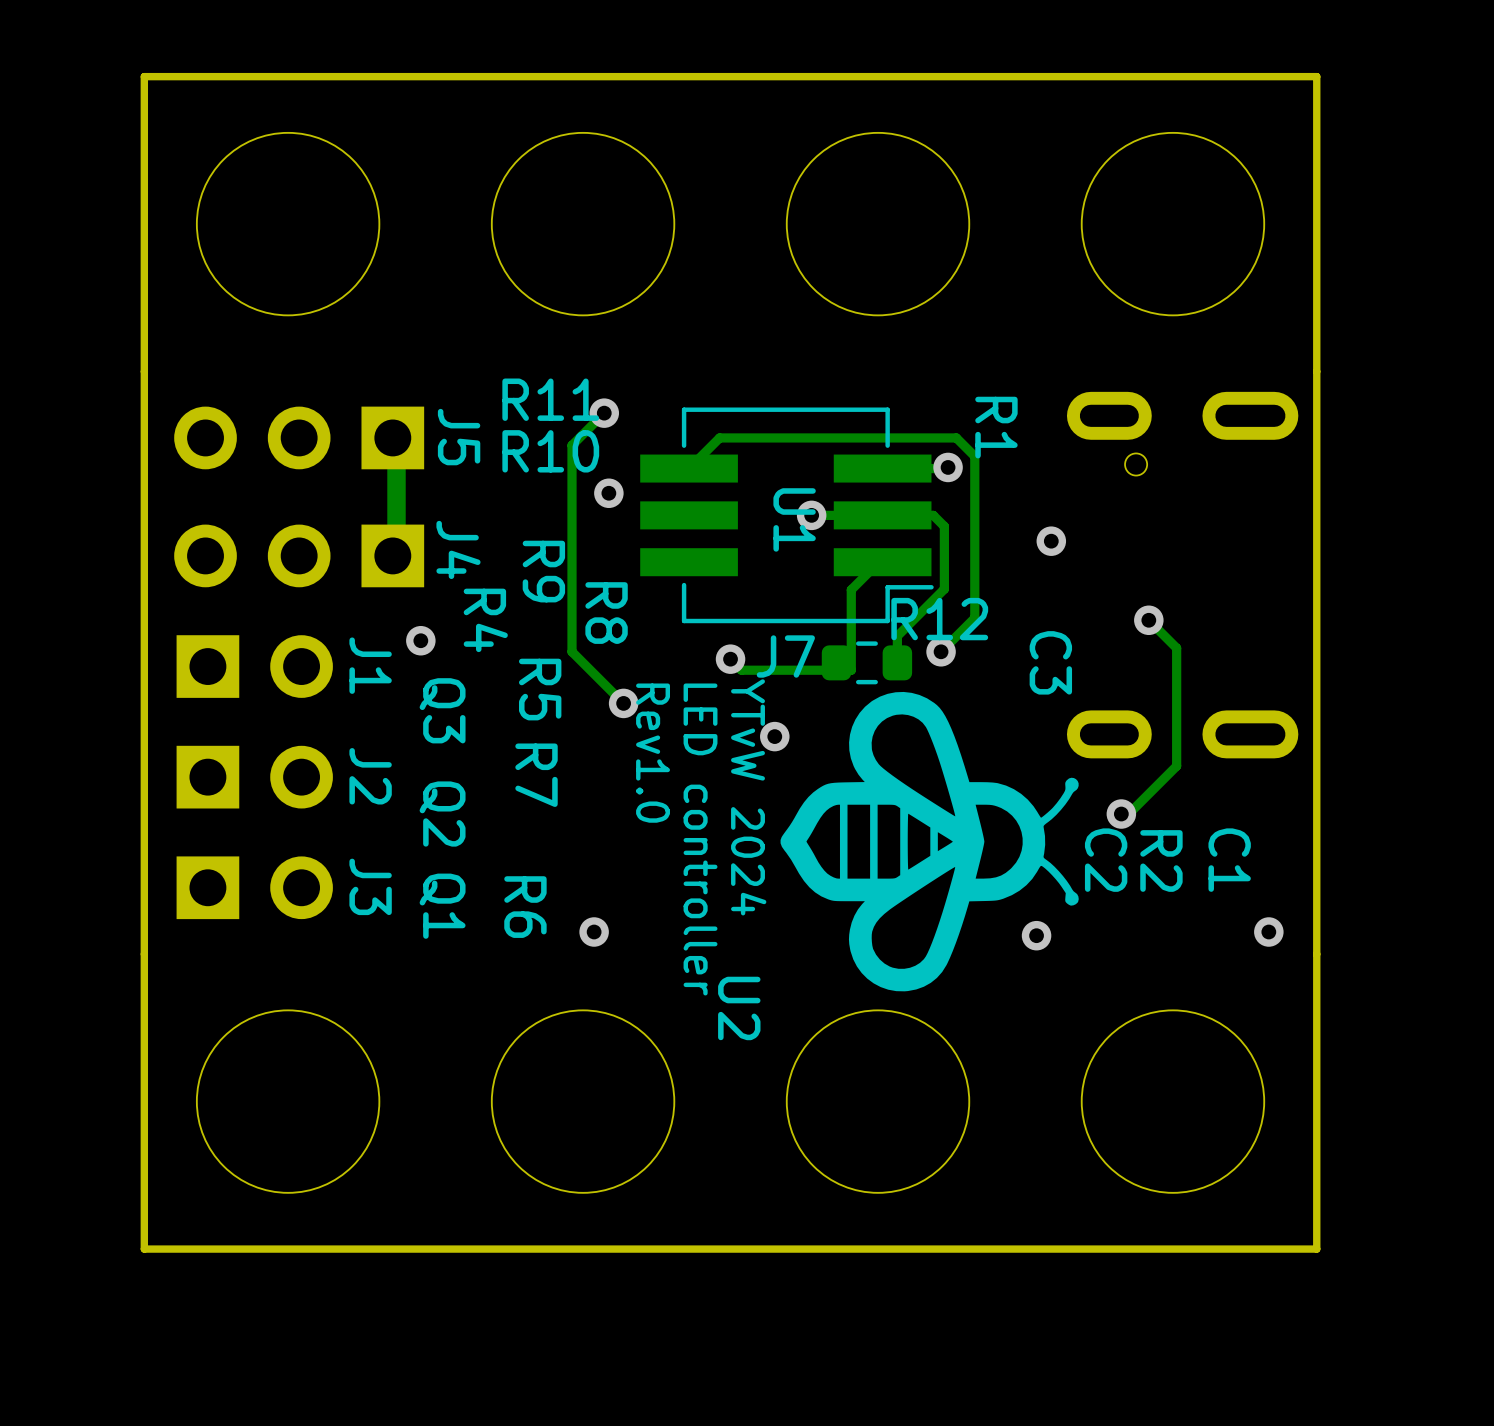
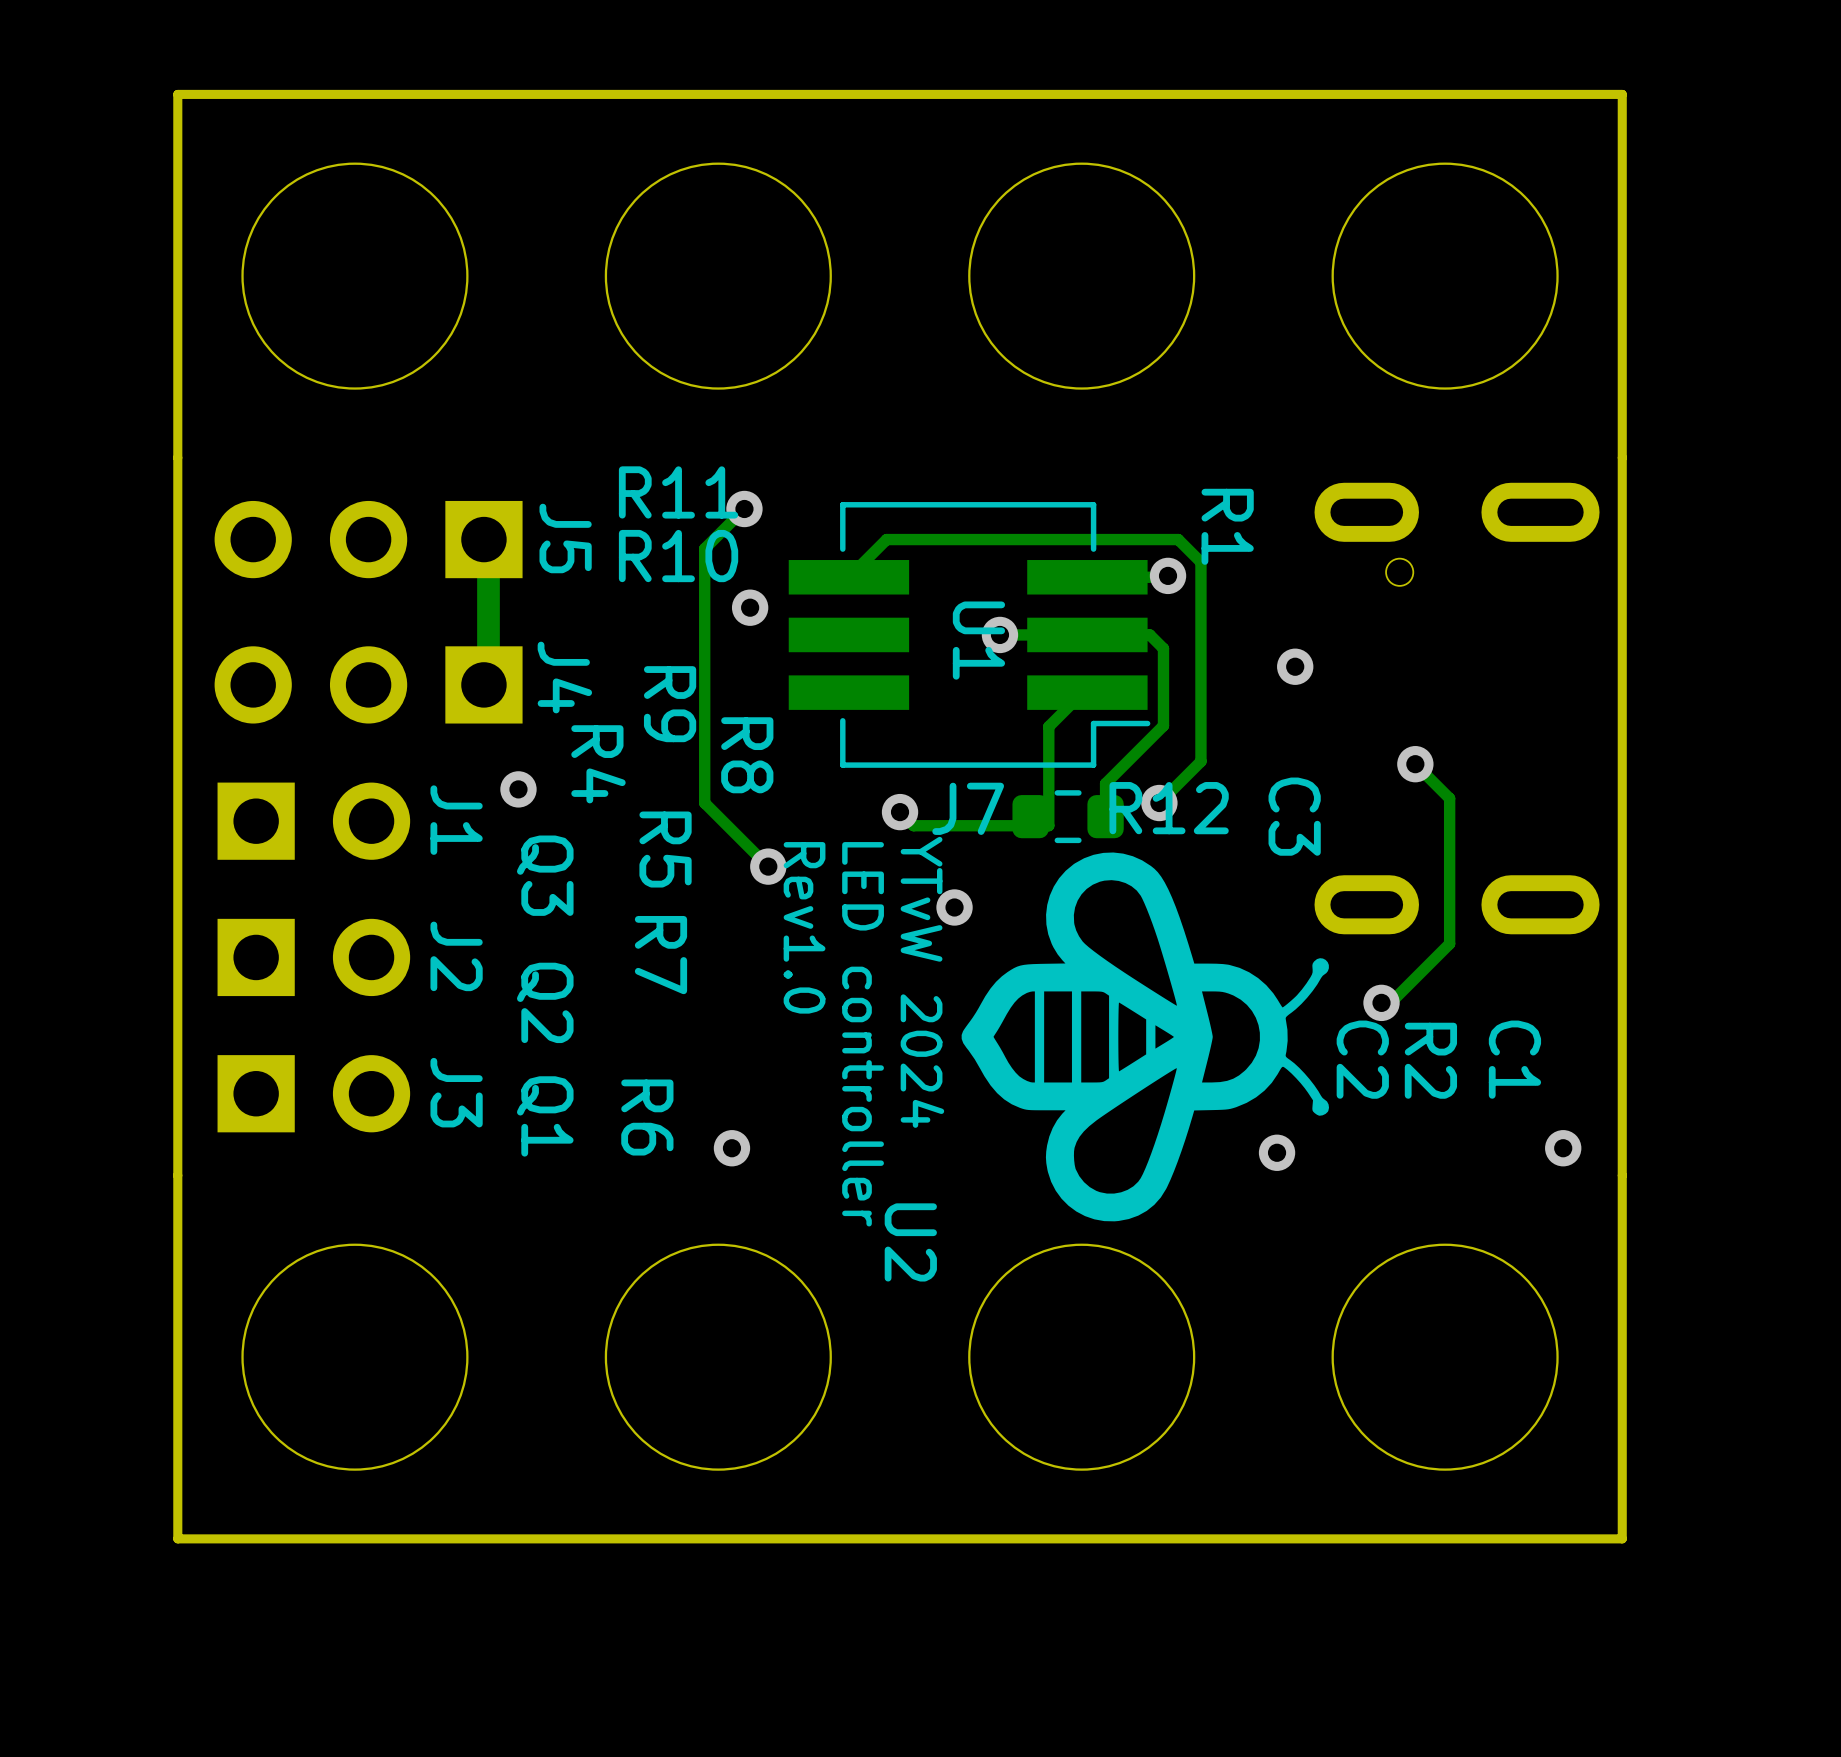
R12 name position: R12 (939, 619) -> R12 (1169, 808)

